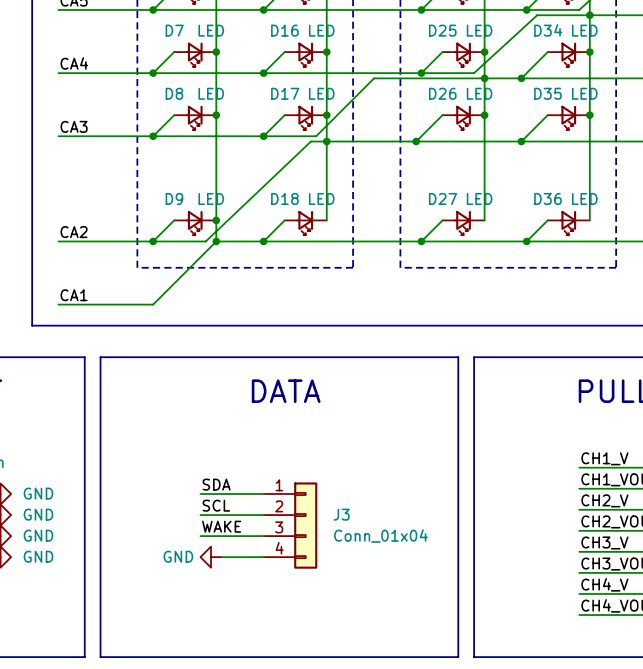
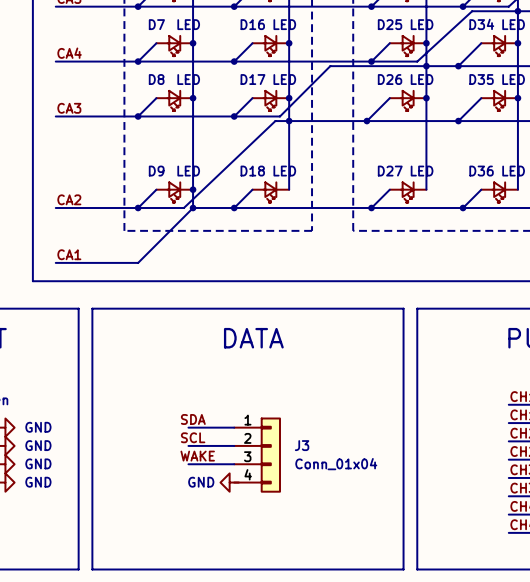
wire: (200, 494) (211, 494) -> none
wire: (200, 515) (211, 515) -> none
wire: (200, 536) (211, 536) -> none
power symbol position: GND (211, 557) -> GND (229, 482)
wire: (221, 557) (263, 557) -> none

